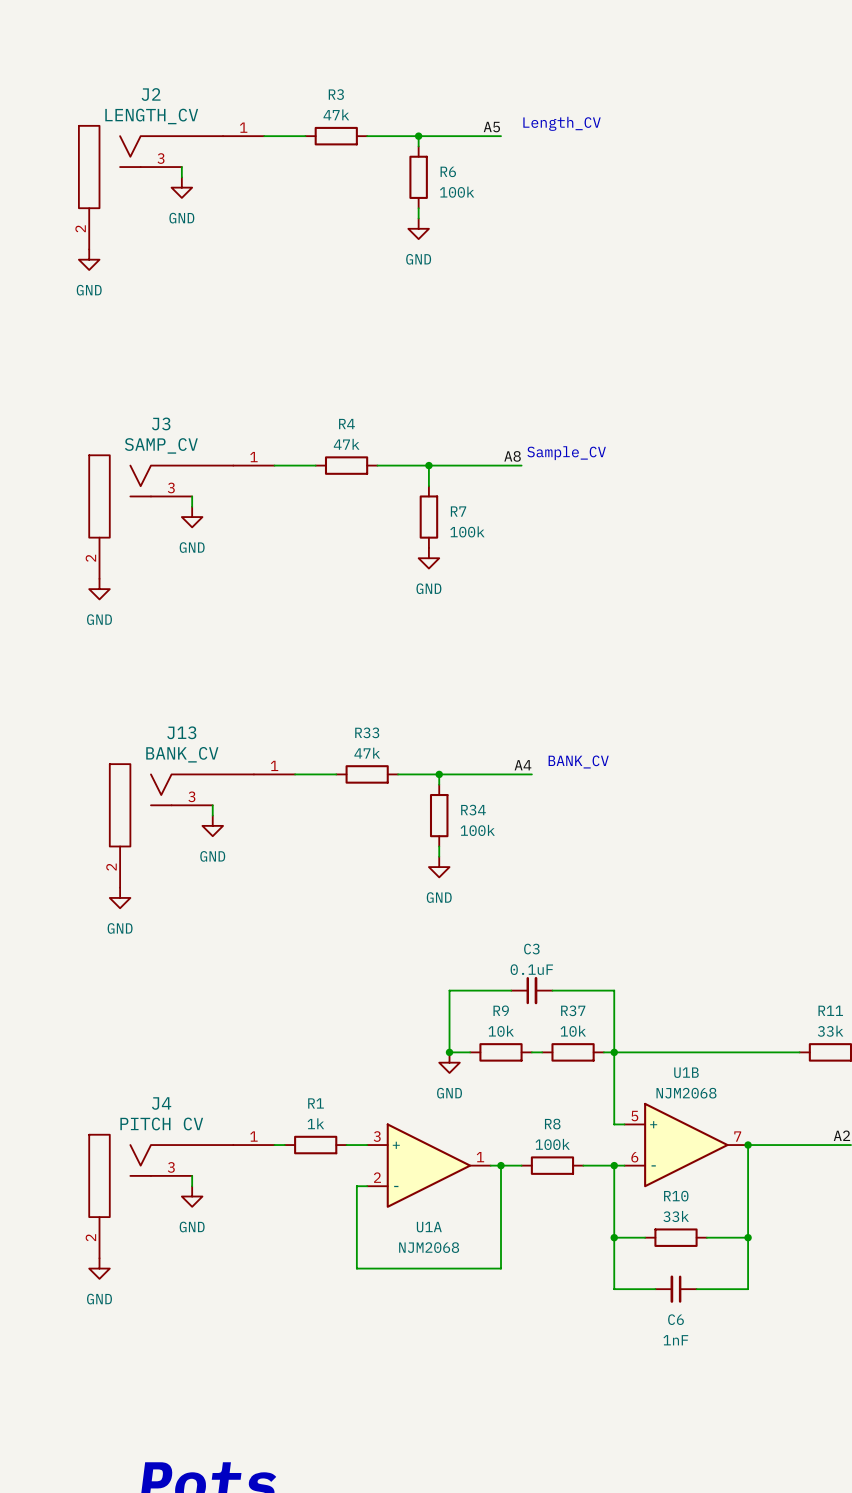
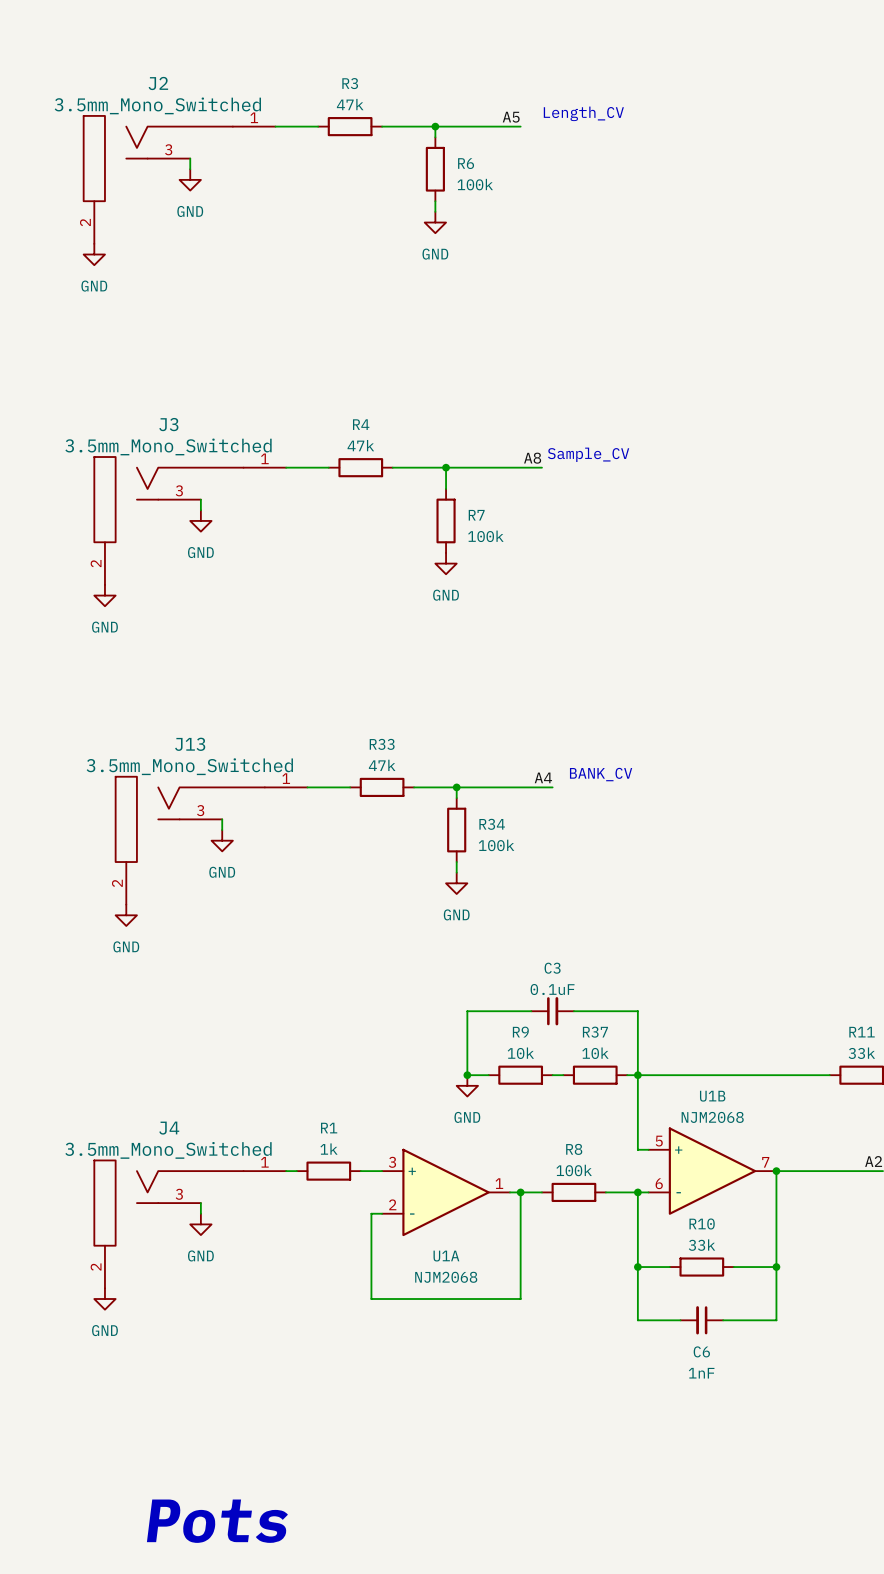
J2 value: LENGTH_CV (151, 116) -> 3.5mm_Mono_Switched (157, 105)
J3 value: SAMP_CV (161, 445) -> 3.5mm_Mono_Switched (168, 446)
J13 value: BANK_CV (182, 754) -> 3.5mm_Mono_Switched (189, 766)
J4 value: PITCH CV (161, 1123) -> 3.5mm_Mono_Switched (168, 1150)

